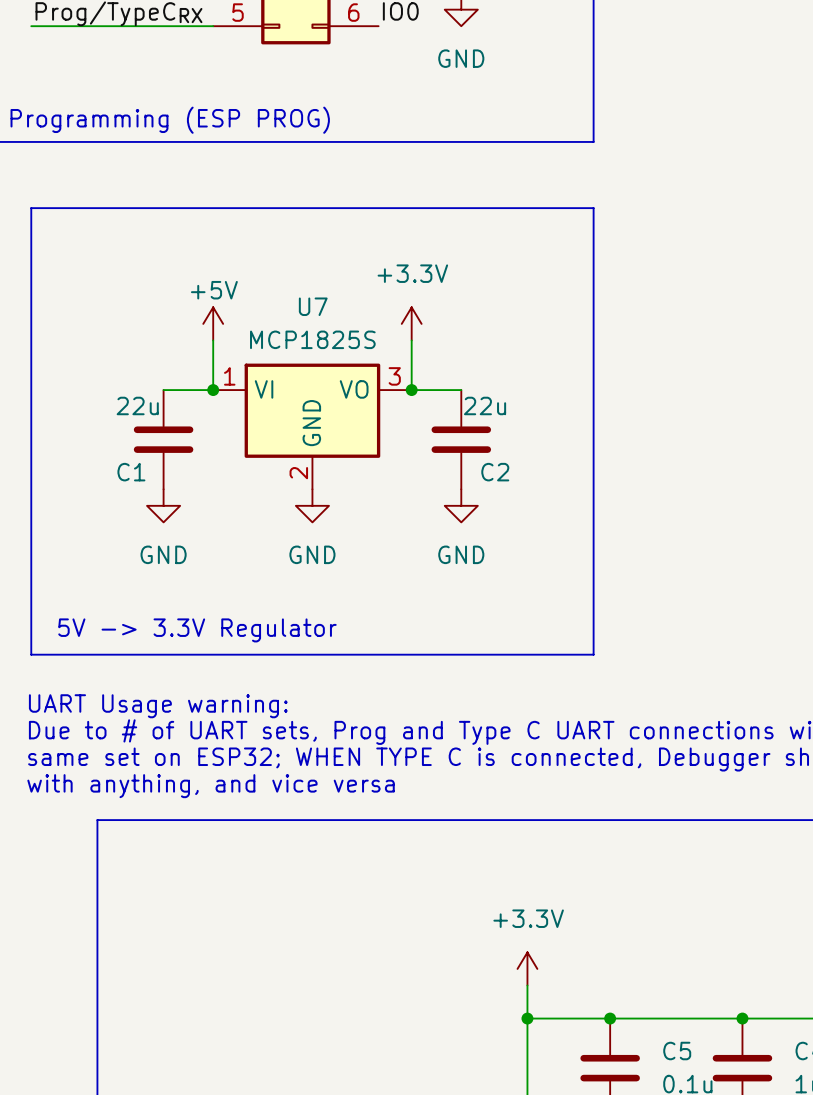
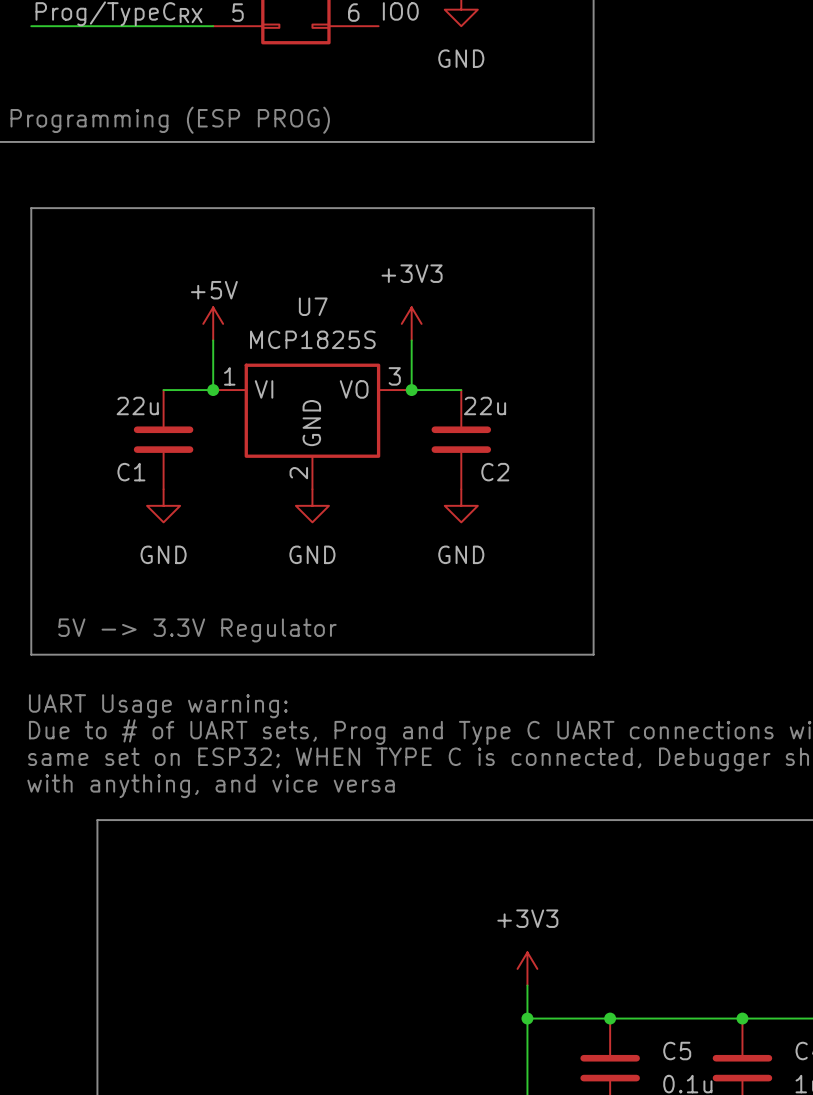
power symbol: +3.3V (411, 323) -> +3V3 (411, 323)
power symbol: +3.3V (527, 968) -> +3V3 (527, 968)

